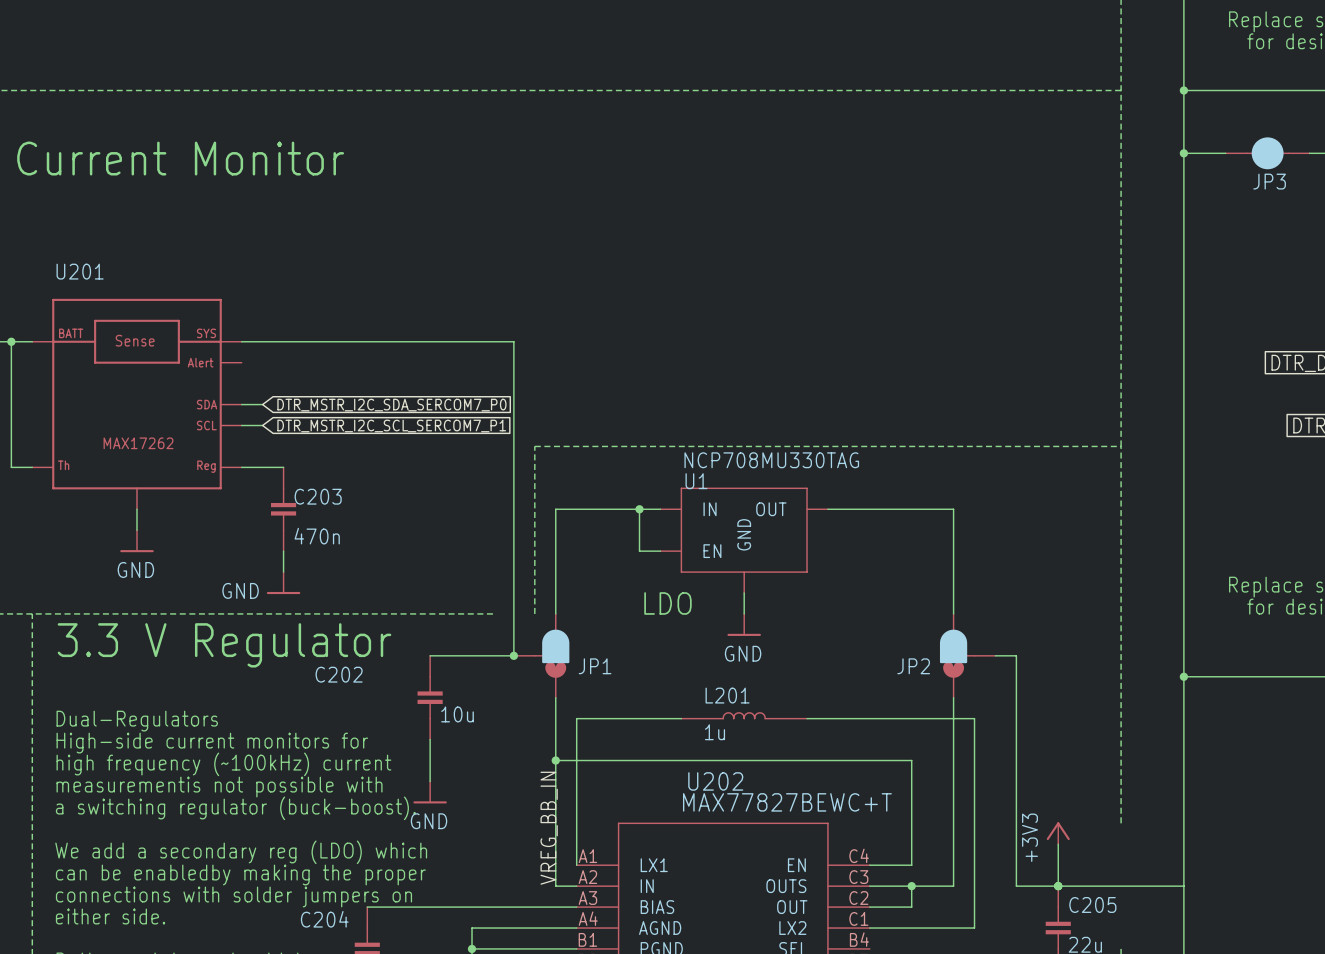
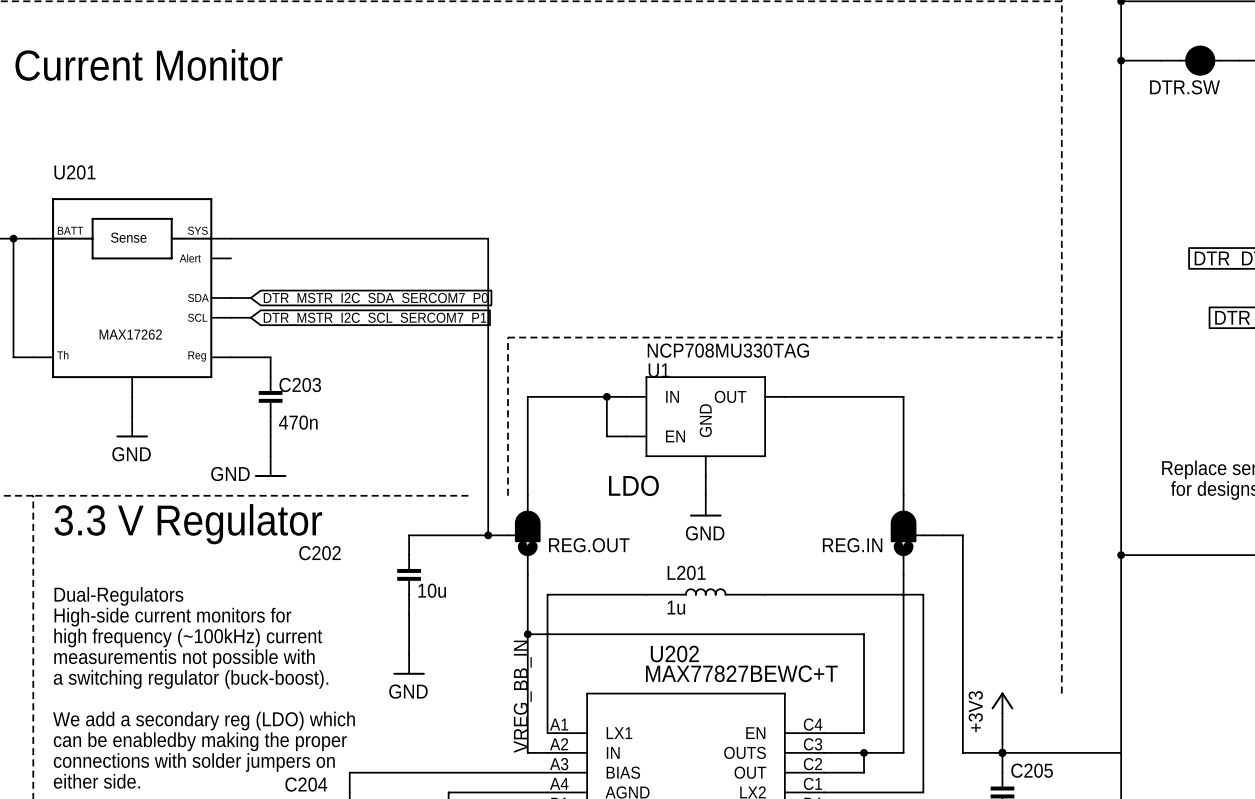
JP3 name: JP3 (1269, 181) -> DTR.SW (1185, 87)
JP1 name: JP1 (595, 666) -> REG.OUT (589, 545)
JP2 name: JP2 (913, 666) -> REG.IN (852, 545)

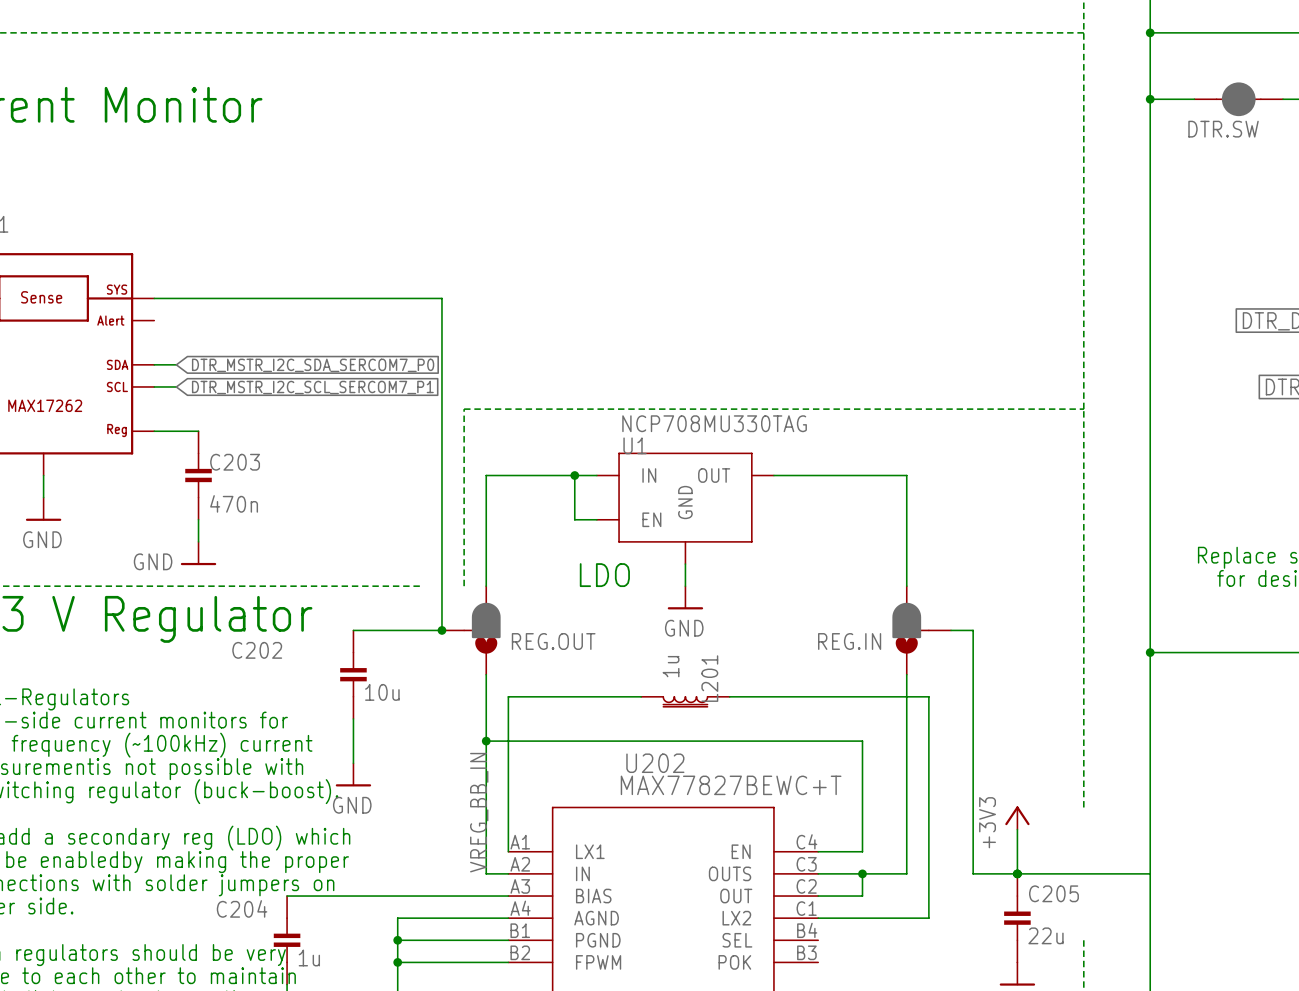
L201 name position: L201 (686, 572) -> L201 (709, 678)
L201 symbol: [646, 588, 766, 596] -> [641, 696, 730, 708]
L201 value position: 1u (676, 607) -> 1u (671, 666)

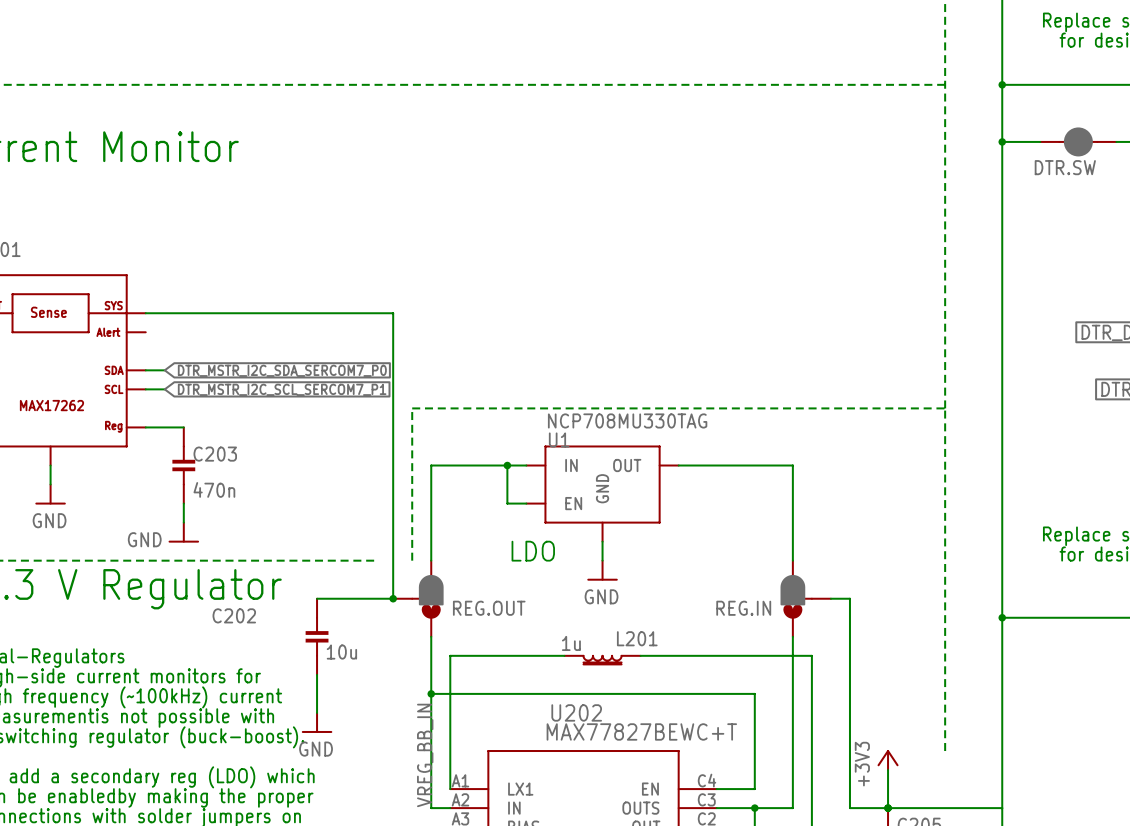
L201 value rotation: 0° (671, 666) -> 90° clockwise (571, 643)
L201 name rotation: 0° (709, 678) -> 90° clockwise (637, 638)

